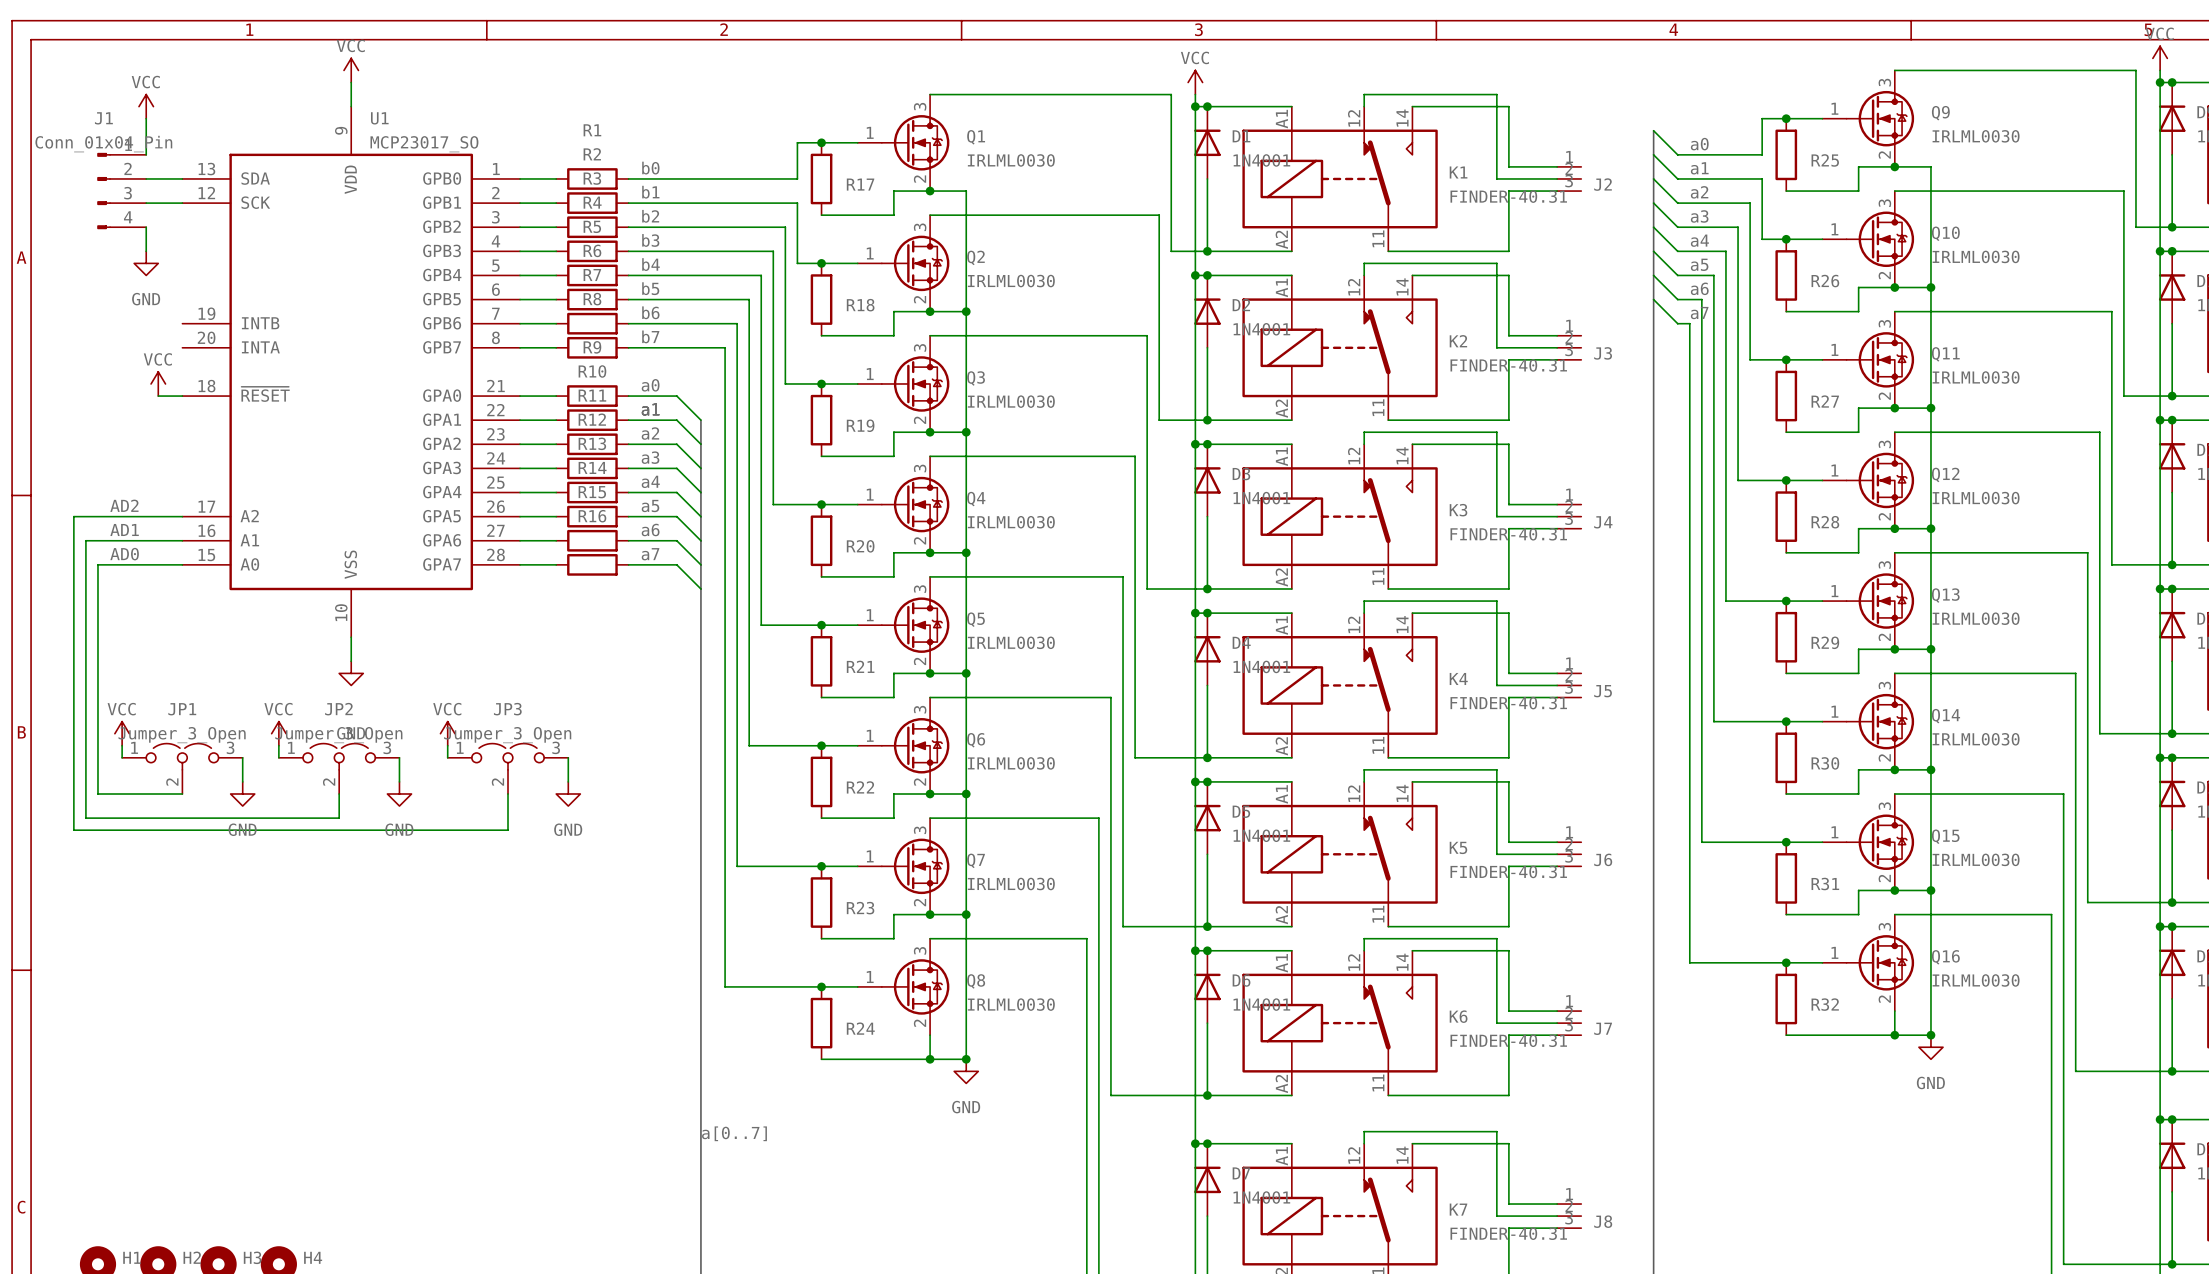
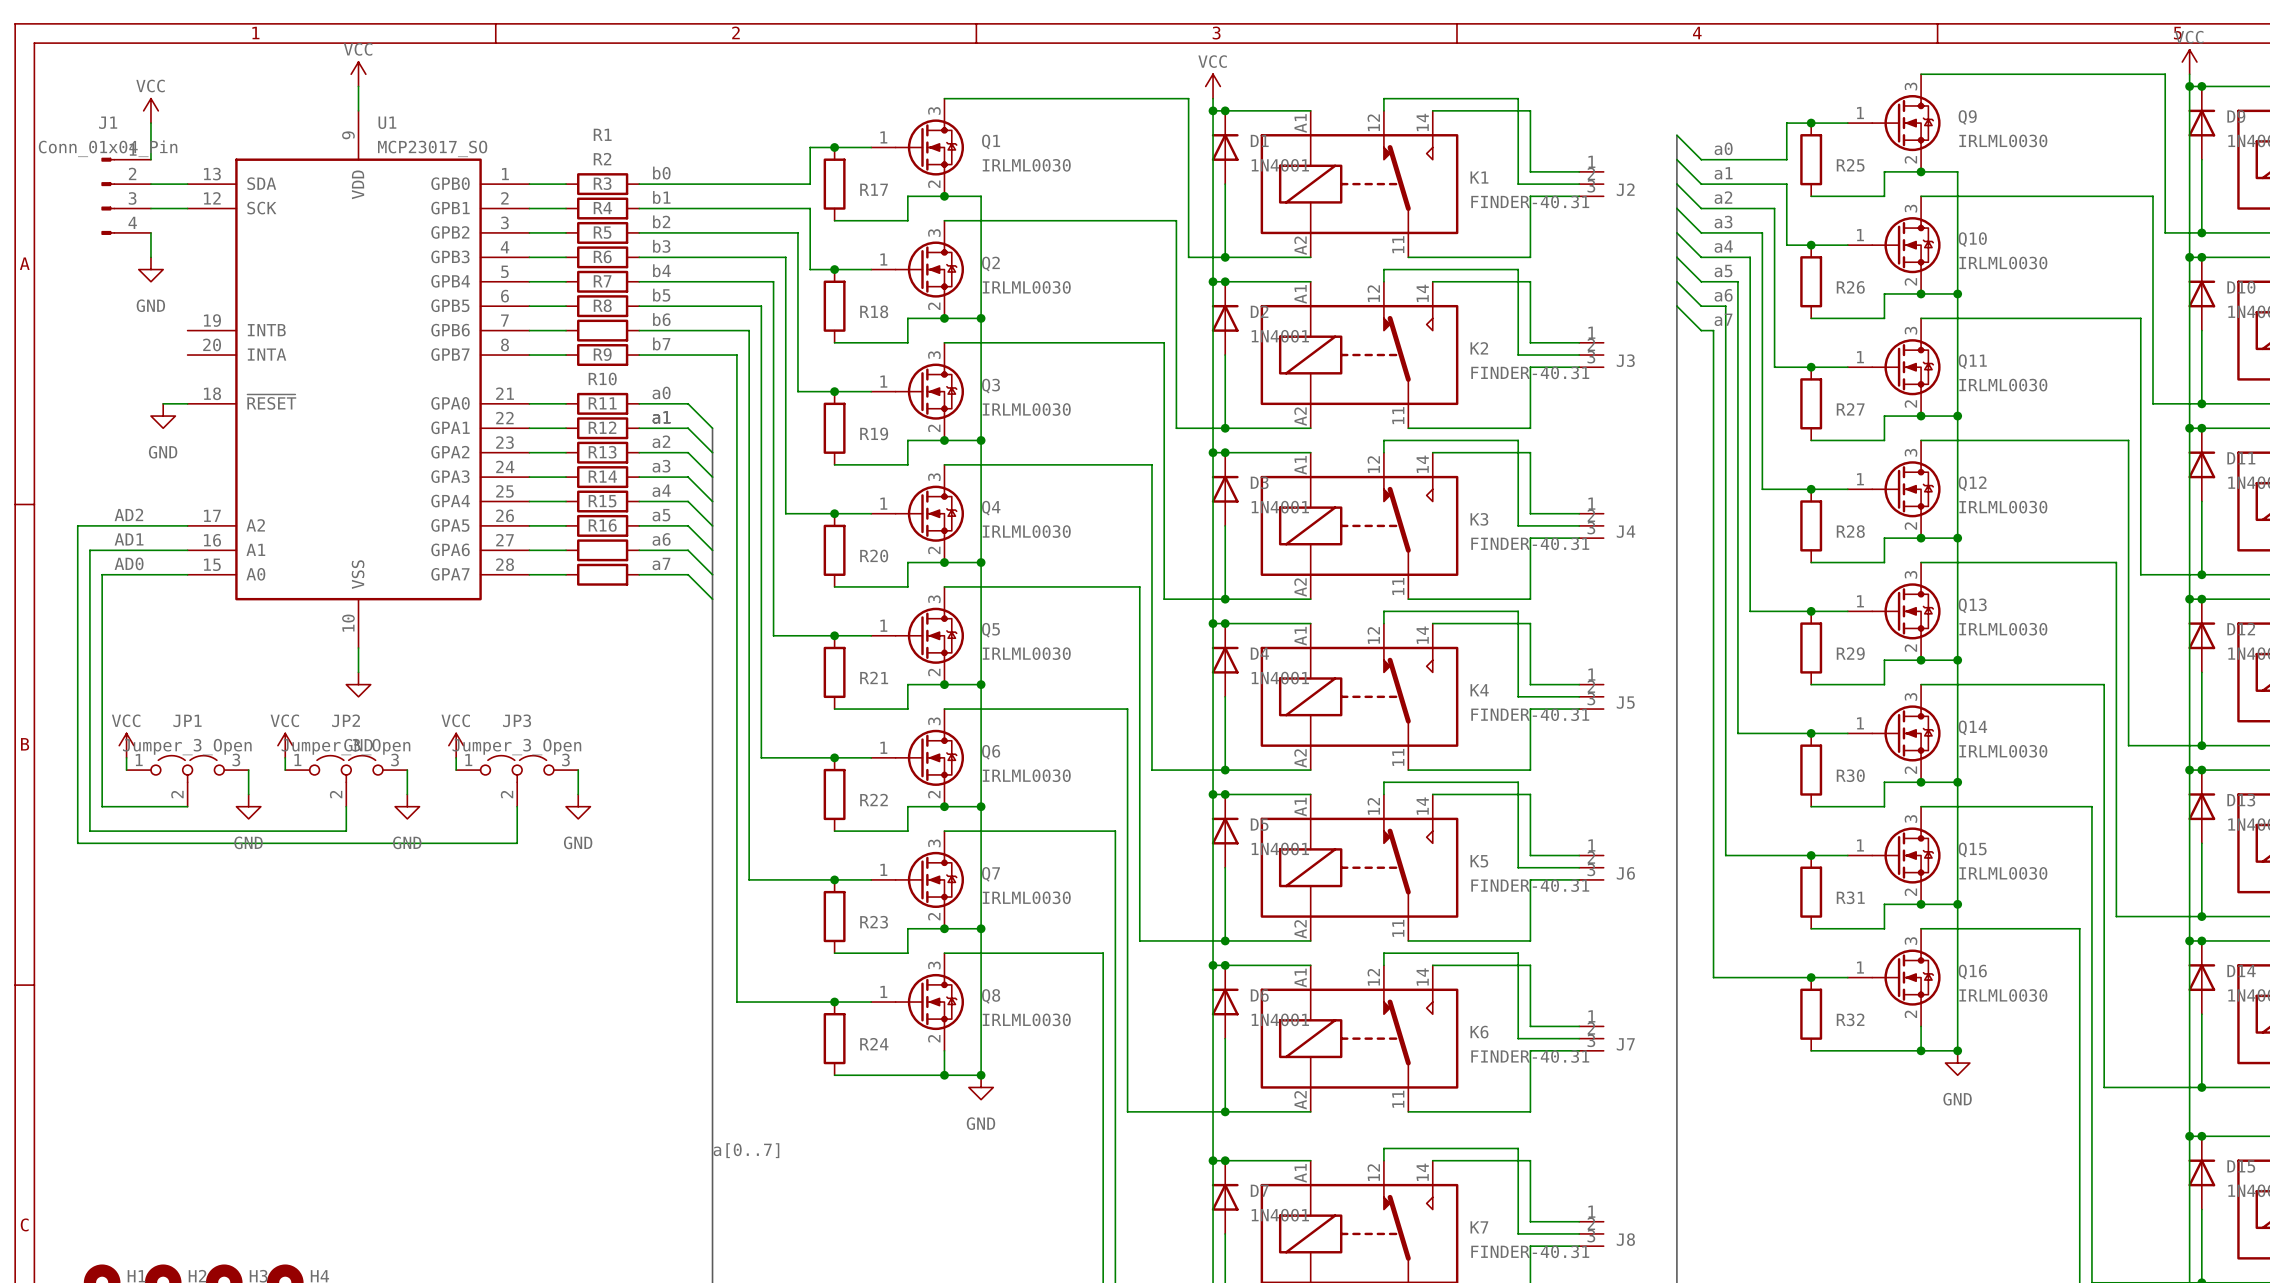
power symbol: VCC (158, 383) -> none
power symbol: none -> GND (163, 416)

